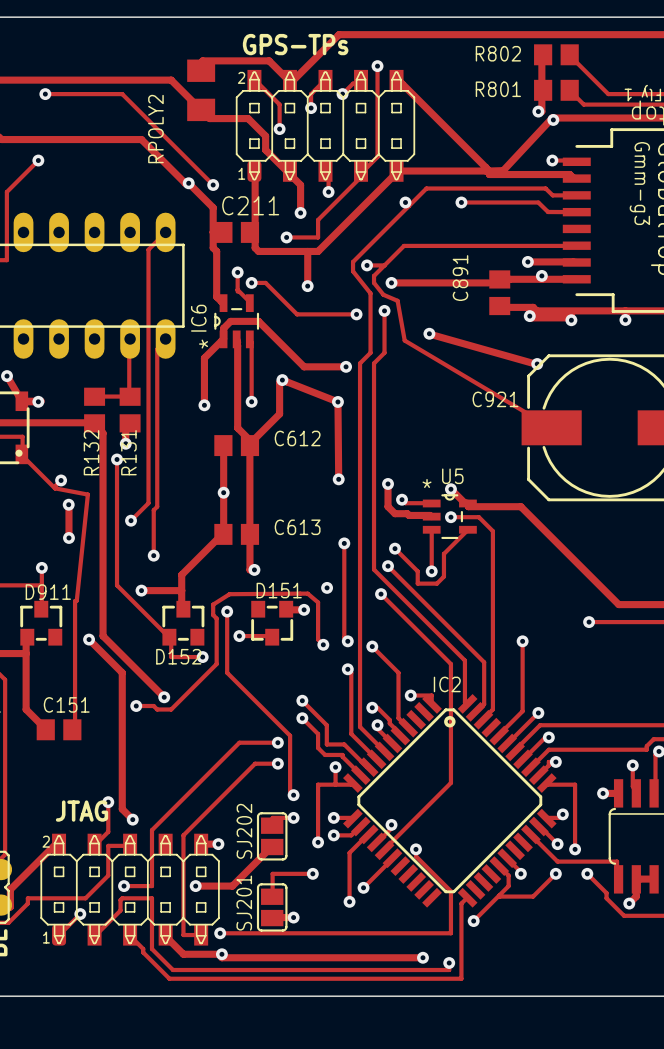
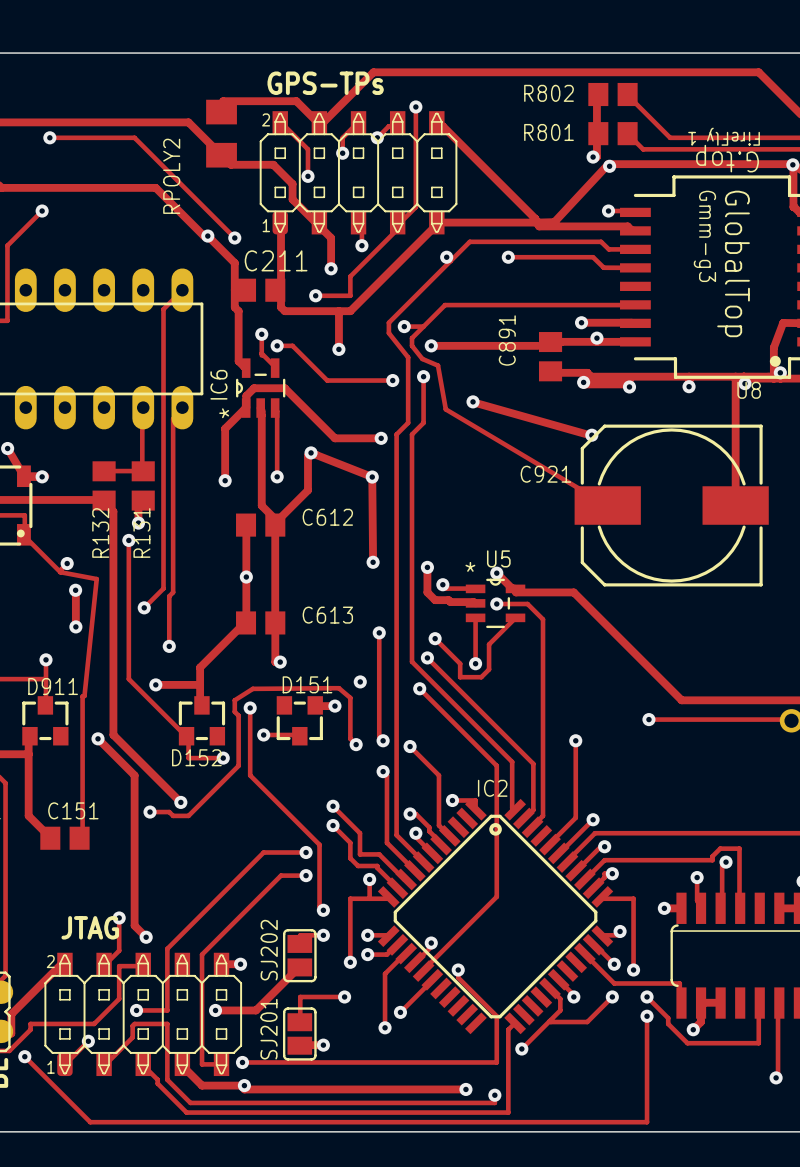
track: none -> (647, 1016) (647, 1122) (90, 1122) (24, 1056)
via: none -> (647, 1016)
via: none -> (24, 1056)

